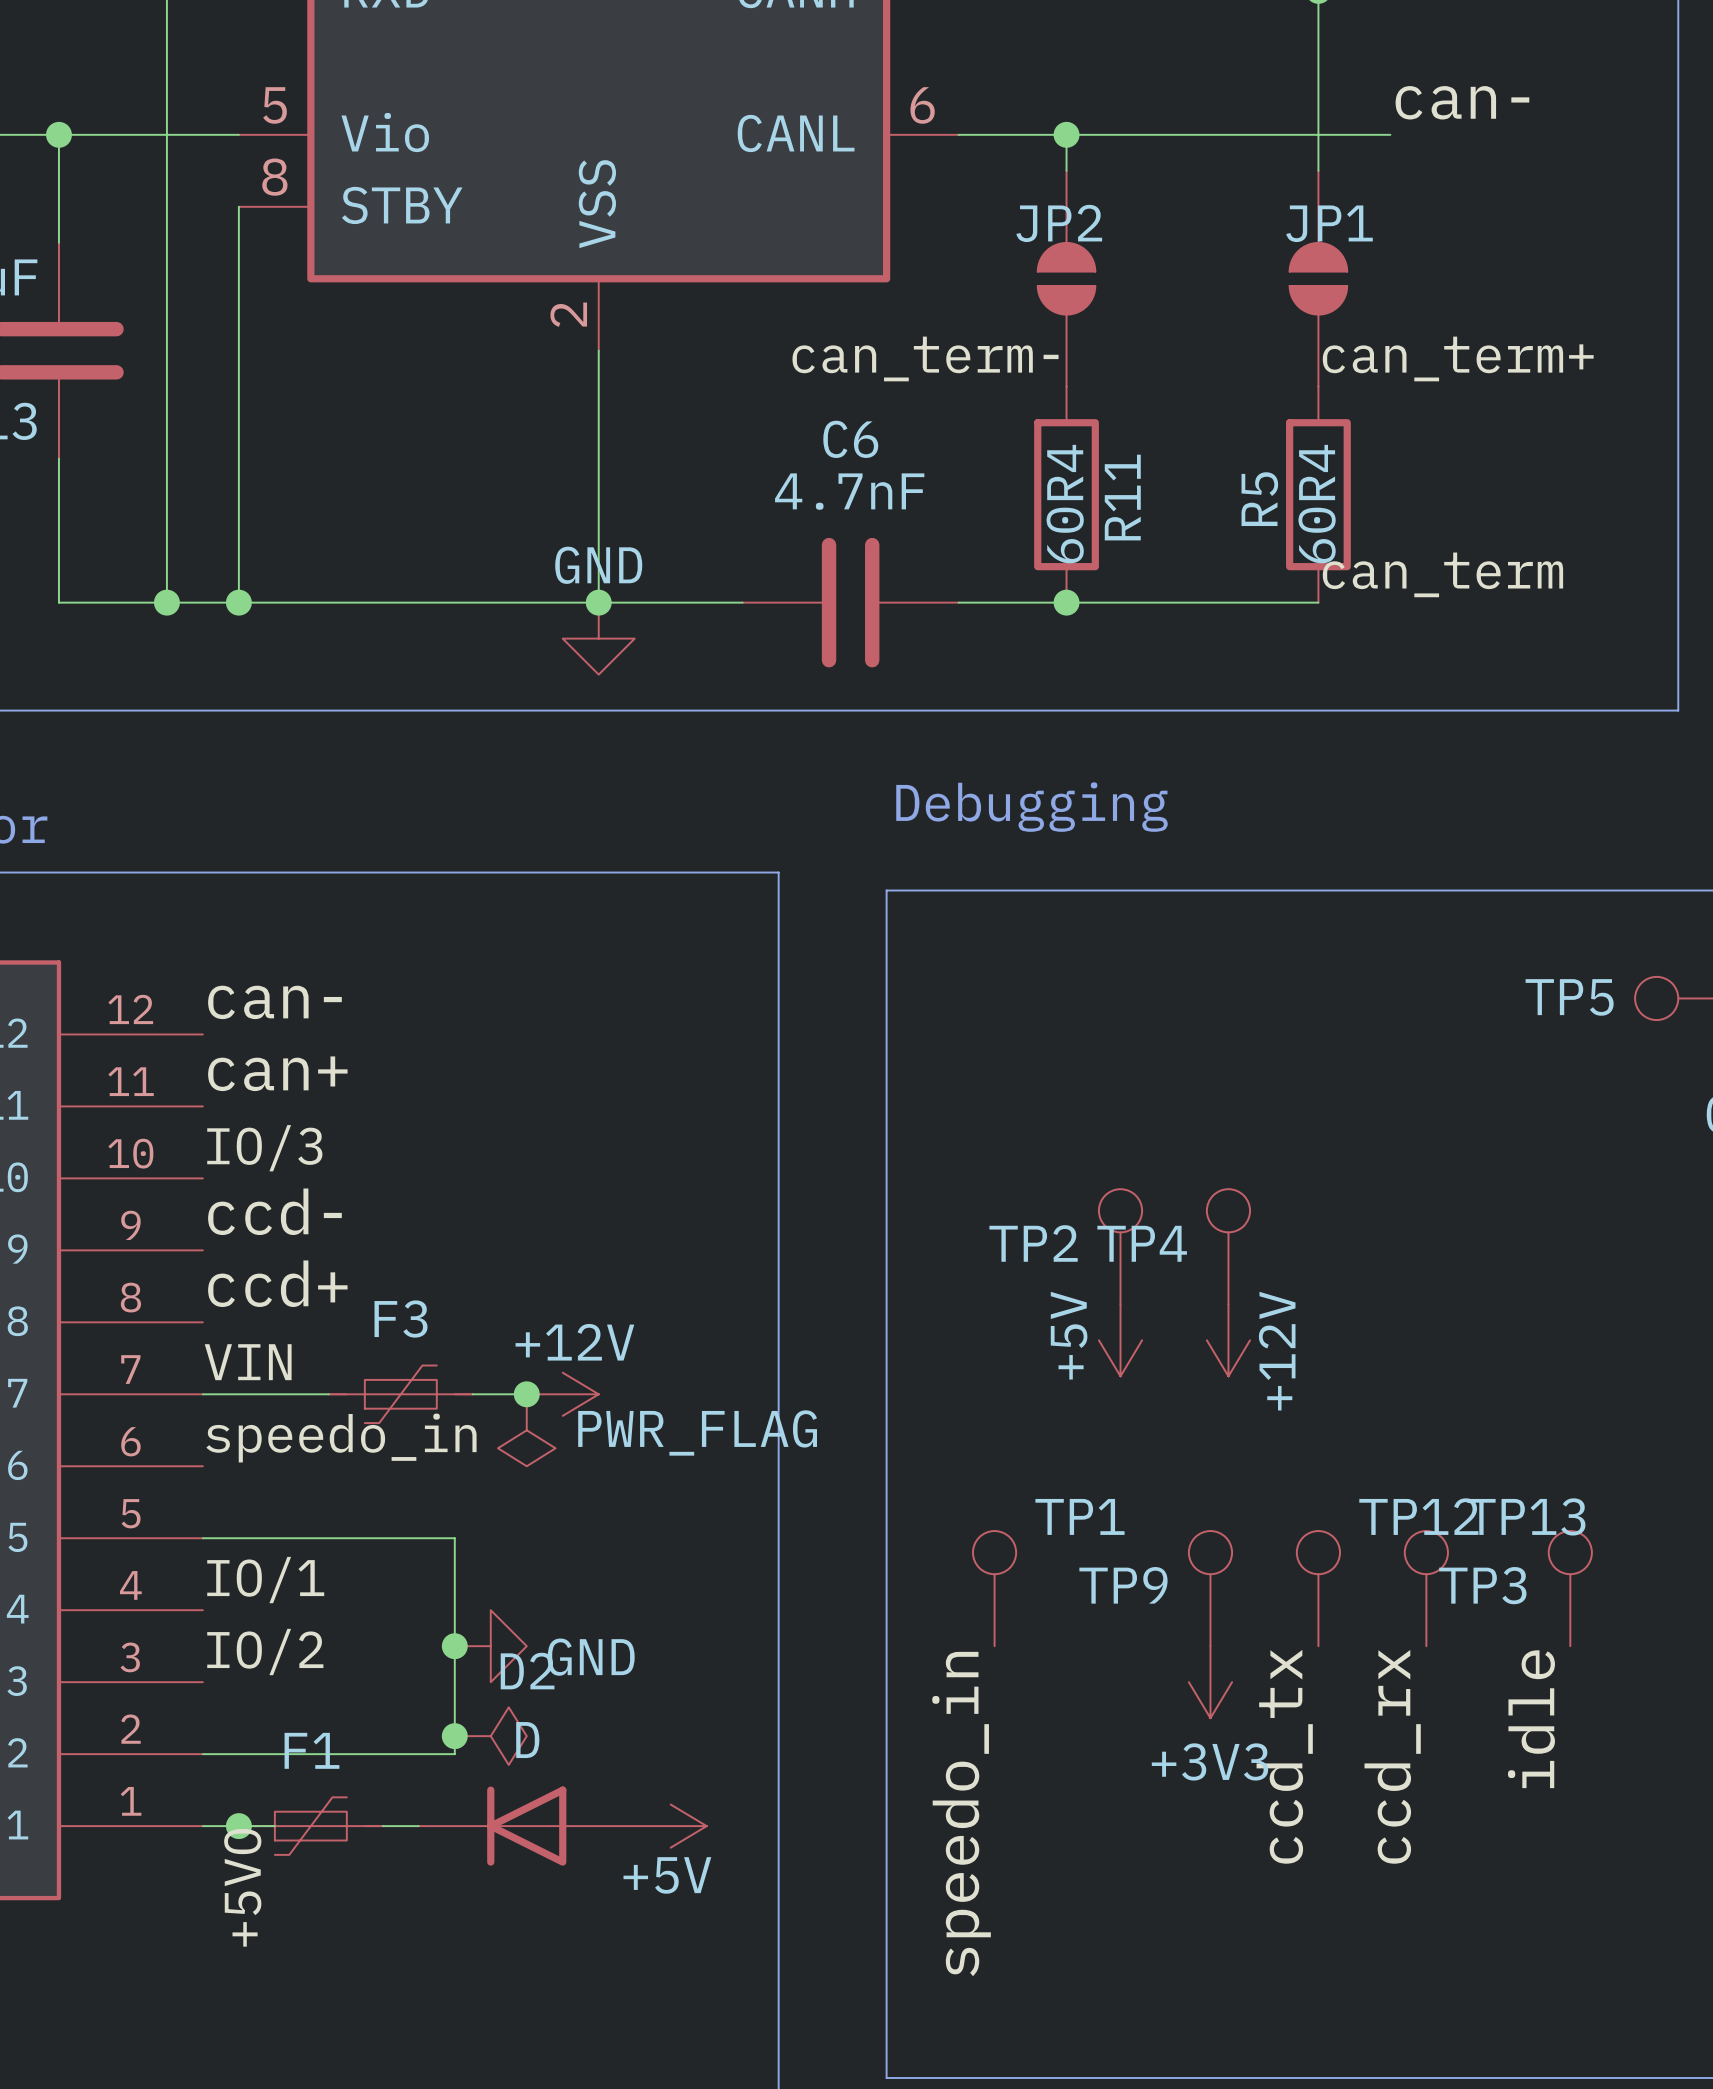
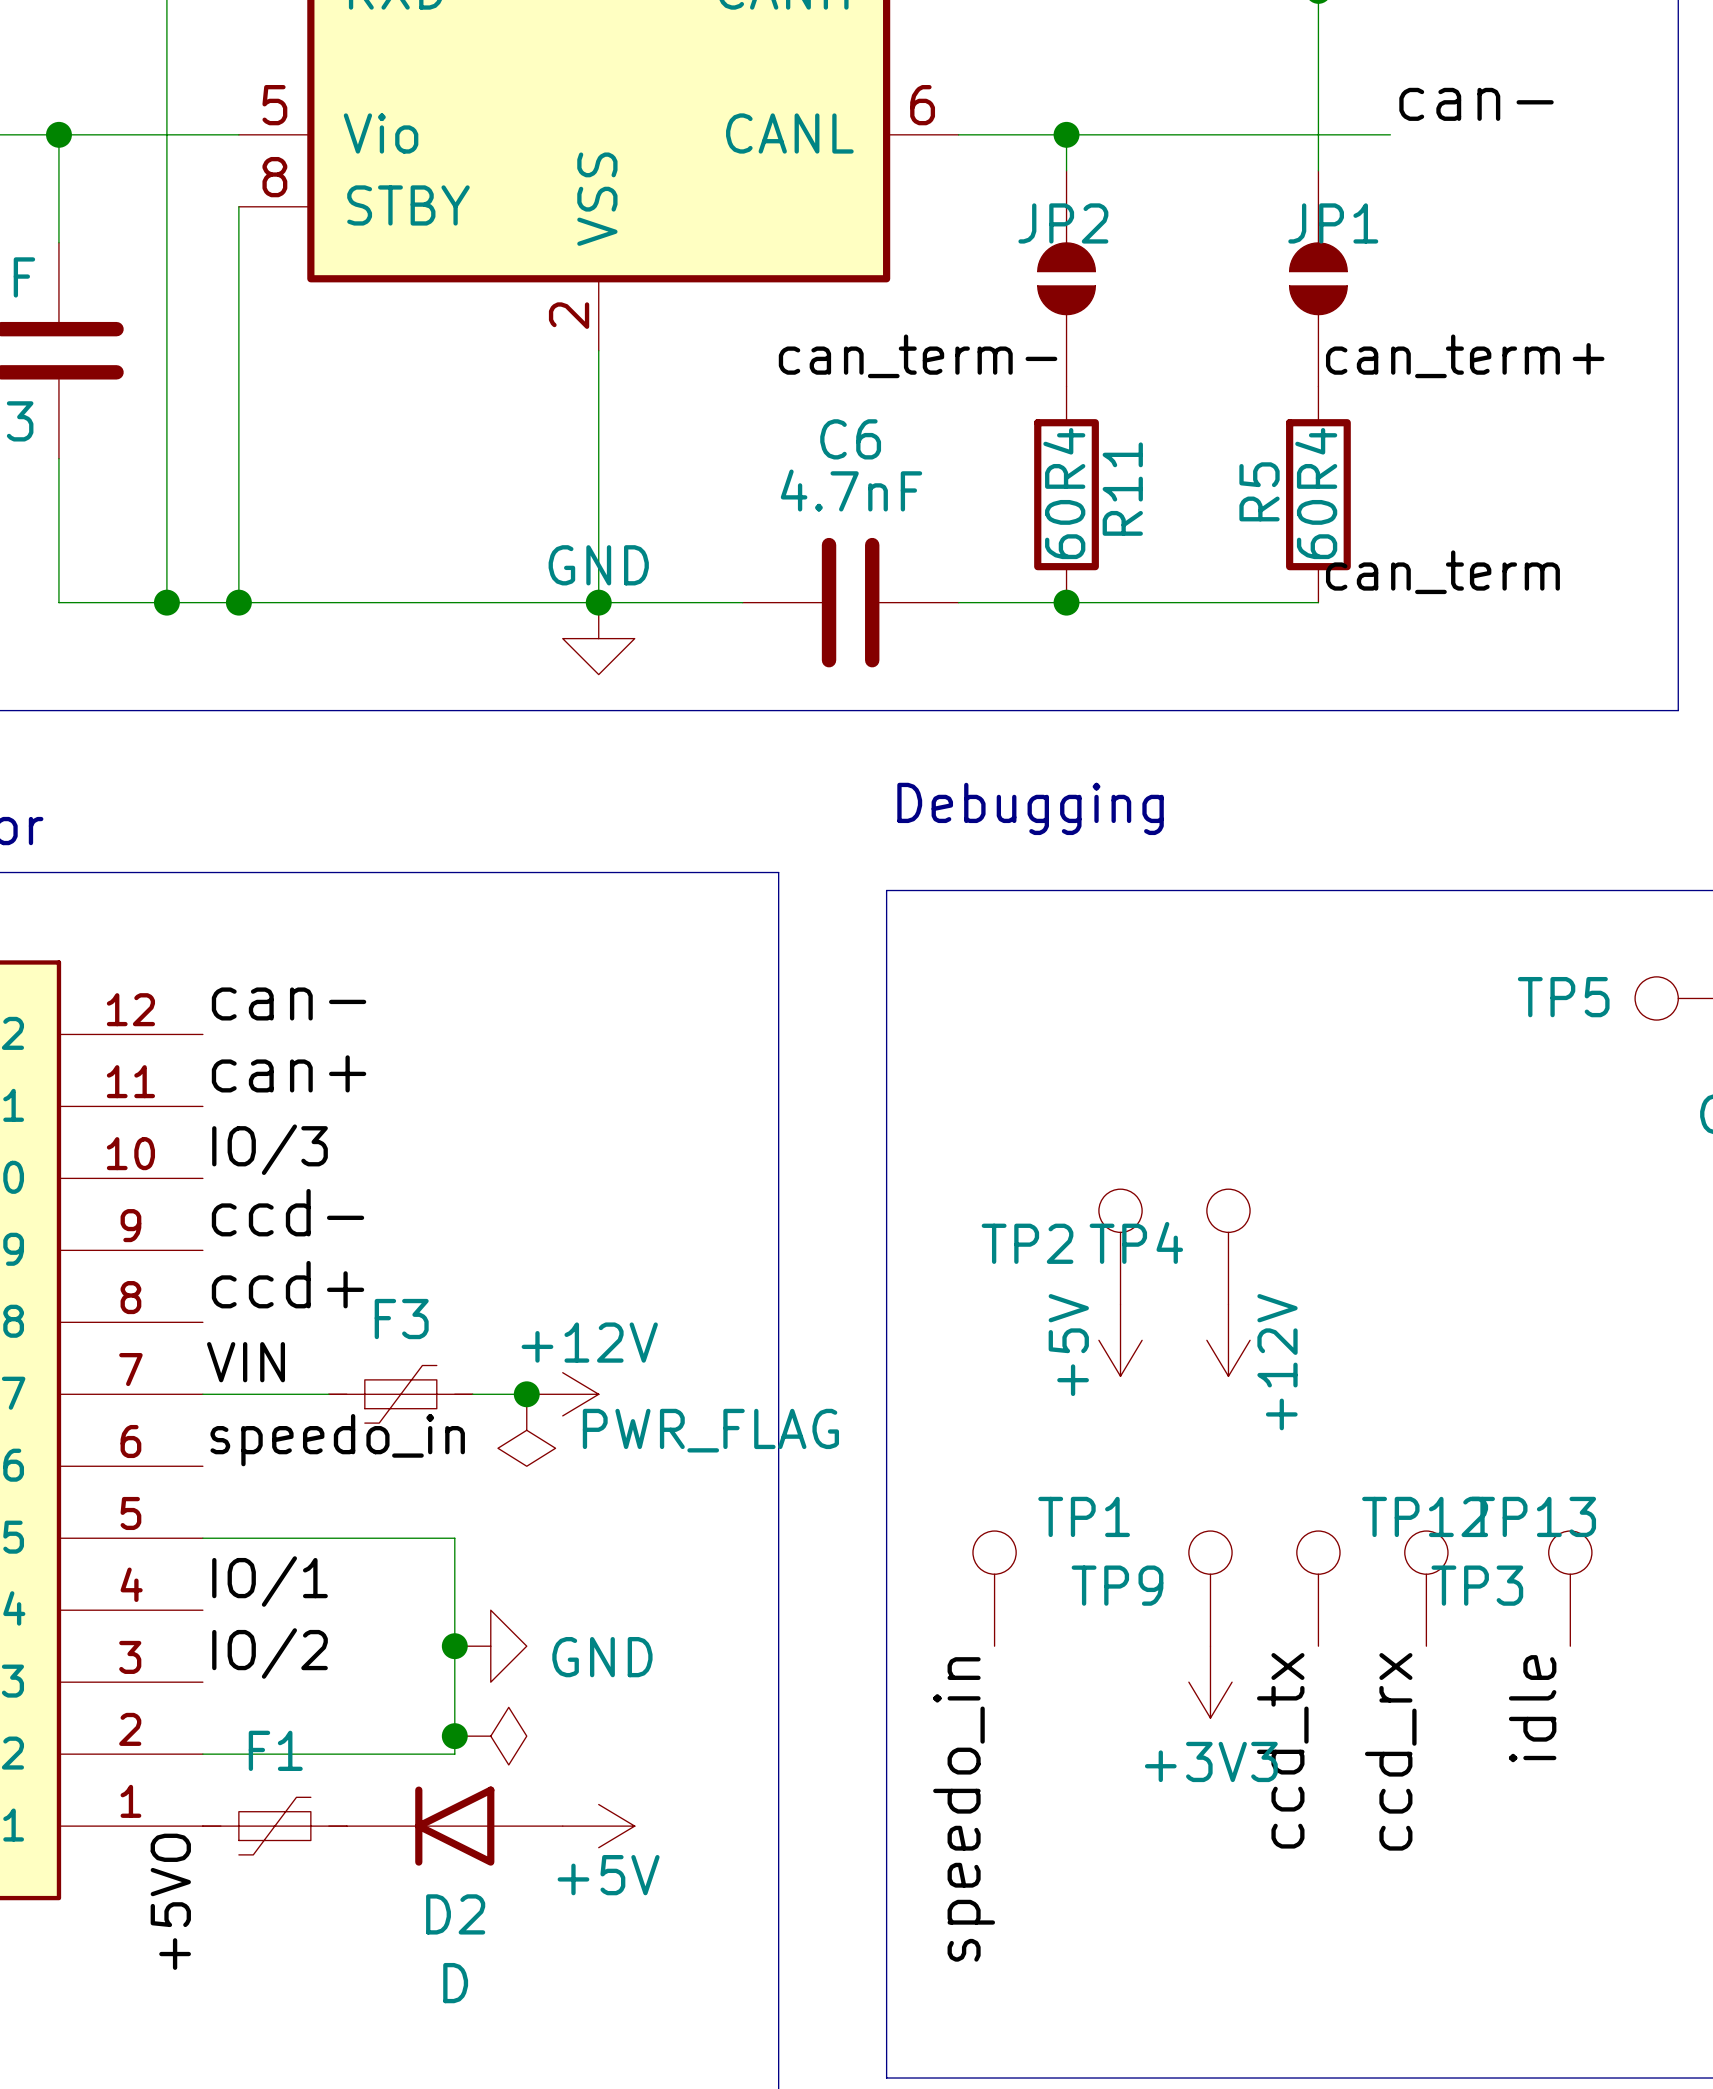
D2 name position: D2 (527, 1671) -> D2 (455, 1914)
D2 value position: D (527, 1740) -> D (455, 1983)
junction: (238, 1826) -> none
F1 position: (310, 1826) -> (274, 1826)
D2 position: (526, 1826) -> (454, 1826)
power symbol position: +5V (670, 1826) -> +5V (598, 1826)
label position: +5VO (242, 1887) -> +5VO (170, 1901)

